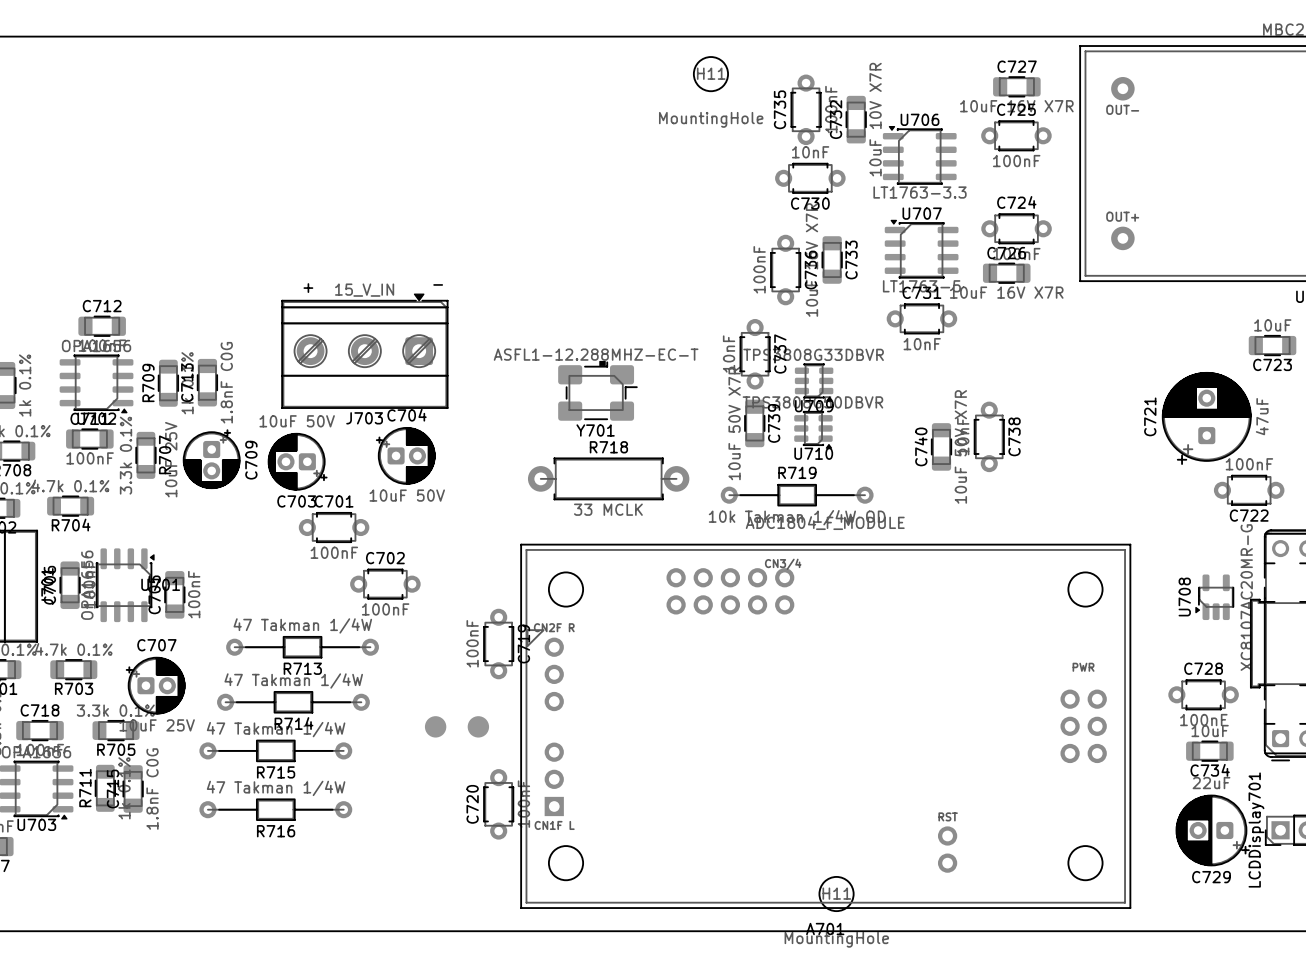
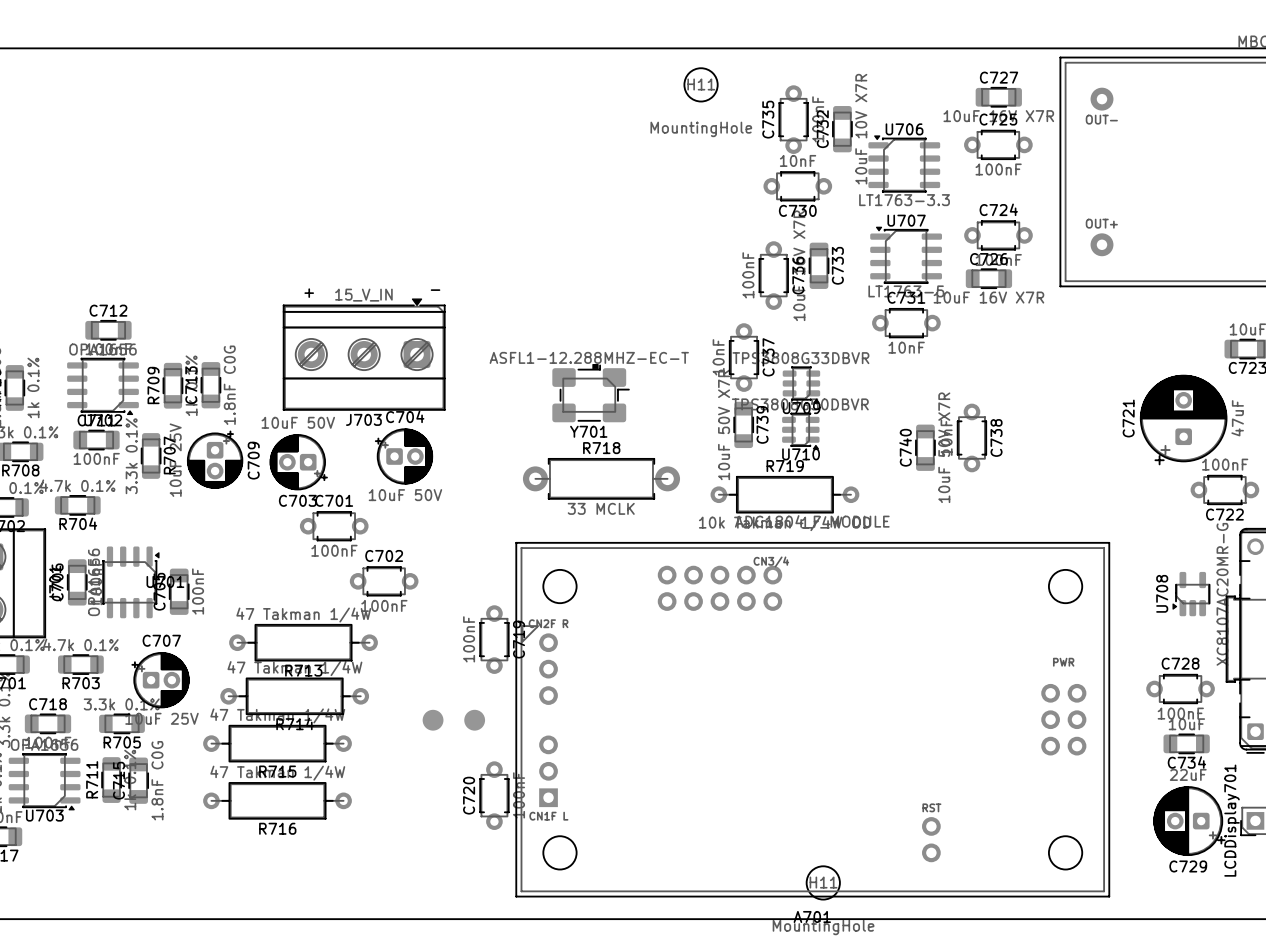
R719 footprint: [720, 484, 874, 507] -> [710, 476, 860, 514]
R713 footprint: [226, 636, 379, 659] -> [229, 624, 378, 662]
R714 footprint: [217, 691, 370, 714] -> [220, 677, 370, 715]
R715 footprint: [199, 739, 353, 762] -> [203, 725, 352, 763]
R716 footprint: [199, 798, 353, 821] -> [203, 782, 352, 820]

